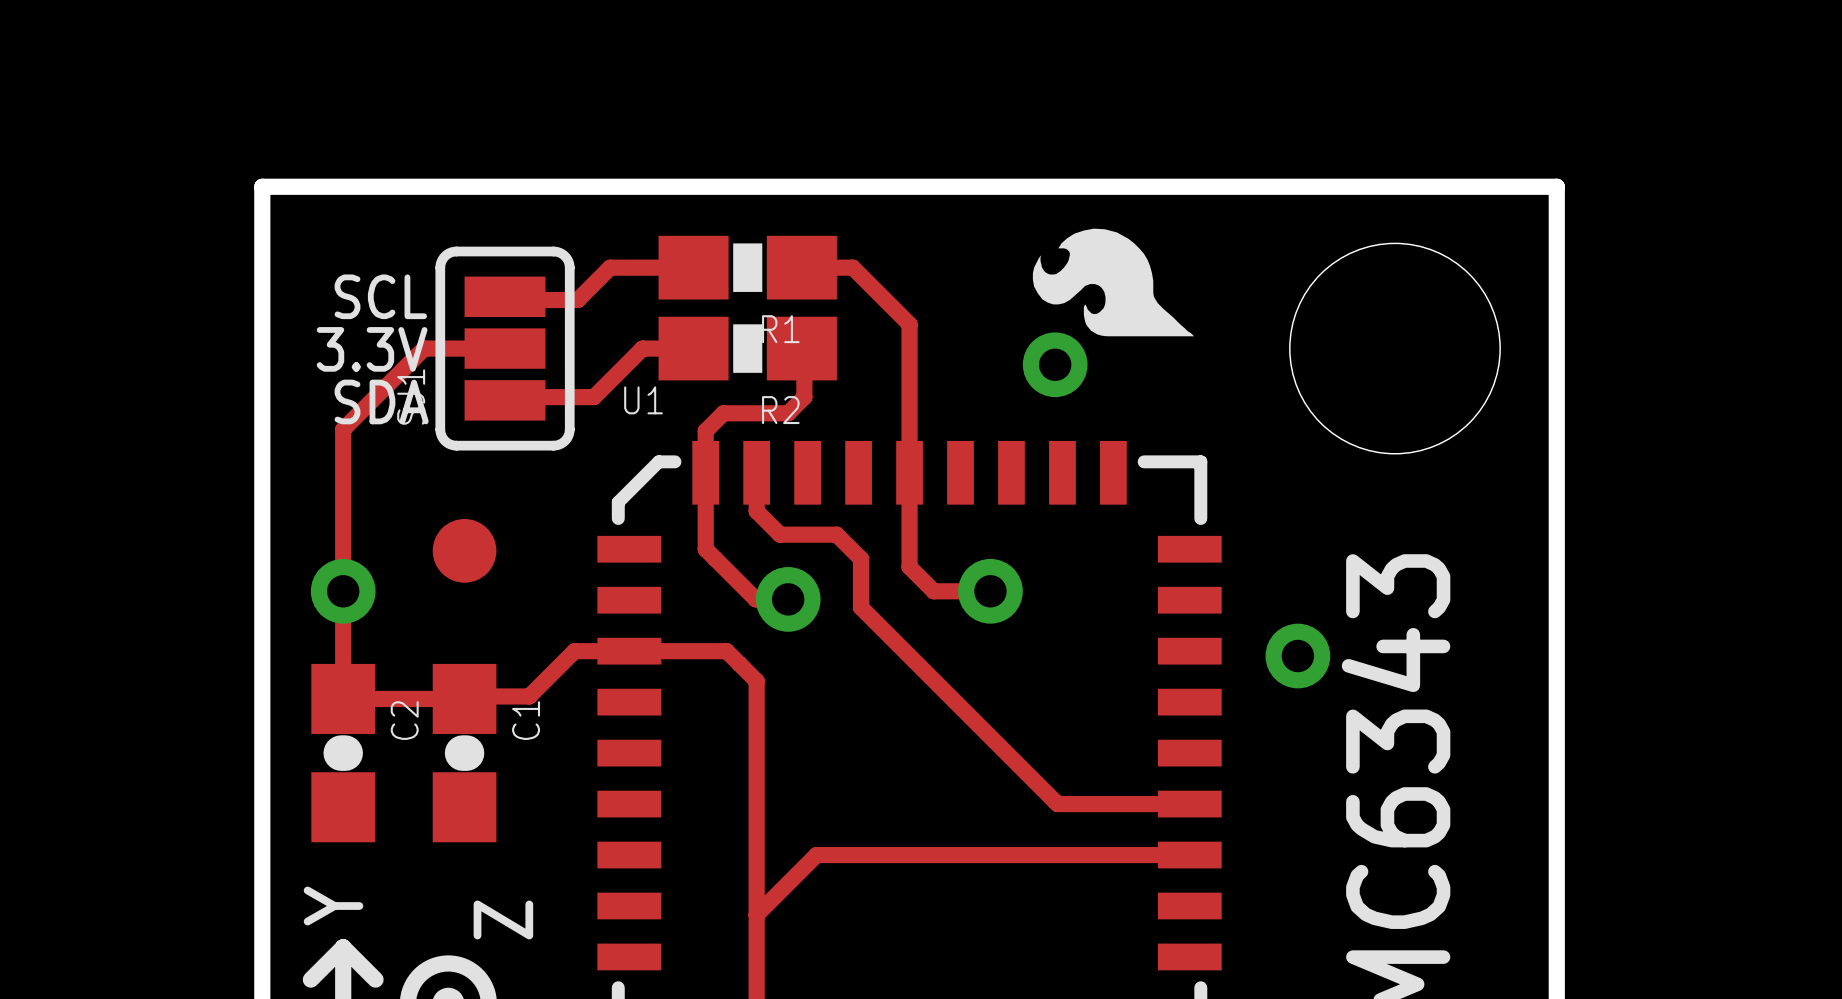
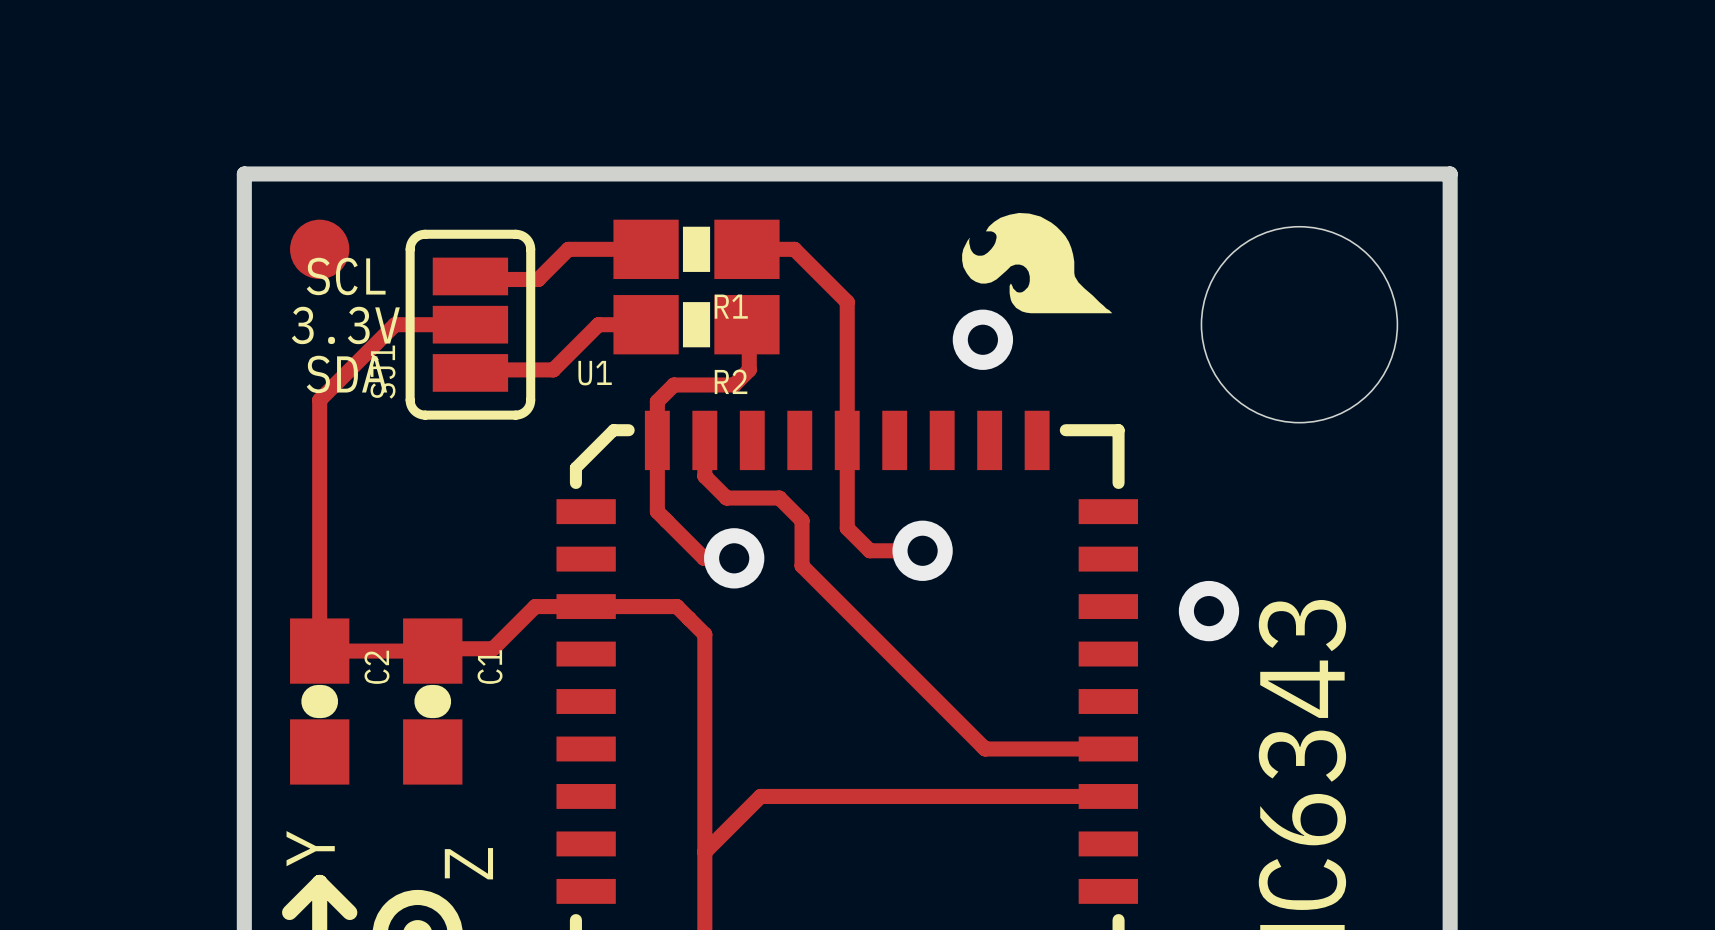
part position: (464, 550) -> (319, 249)
via: (343, 591) -> none

